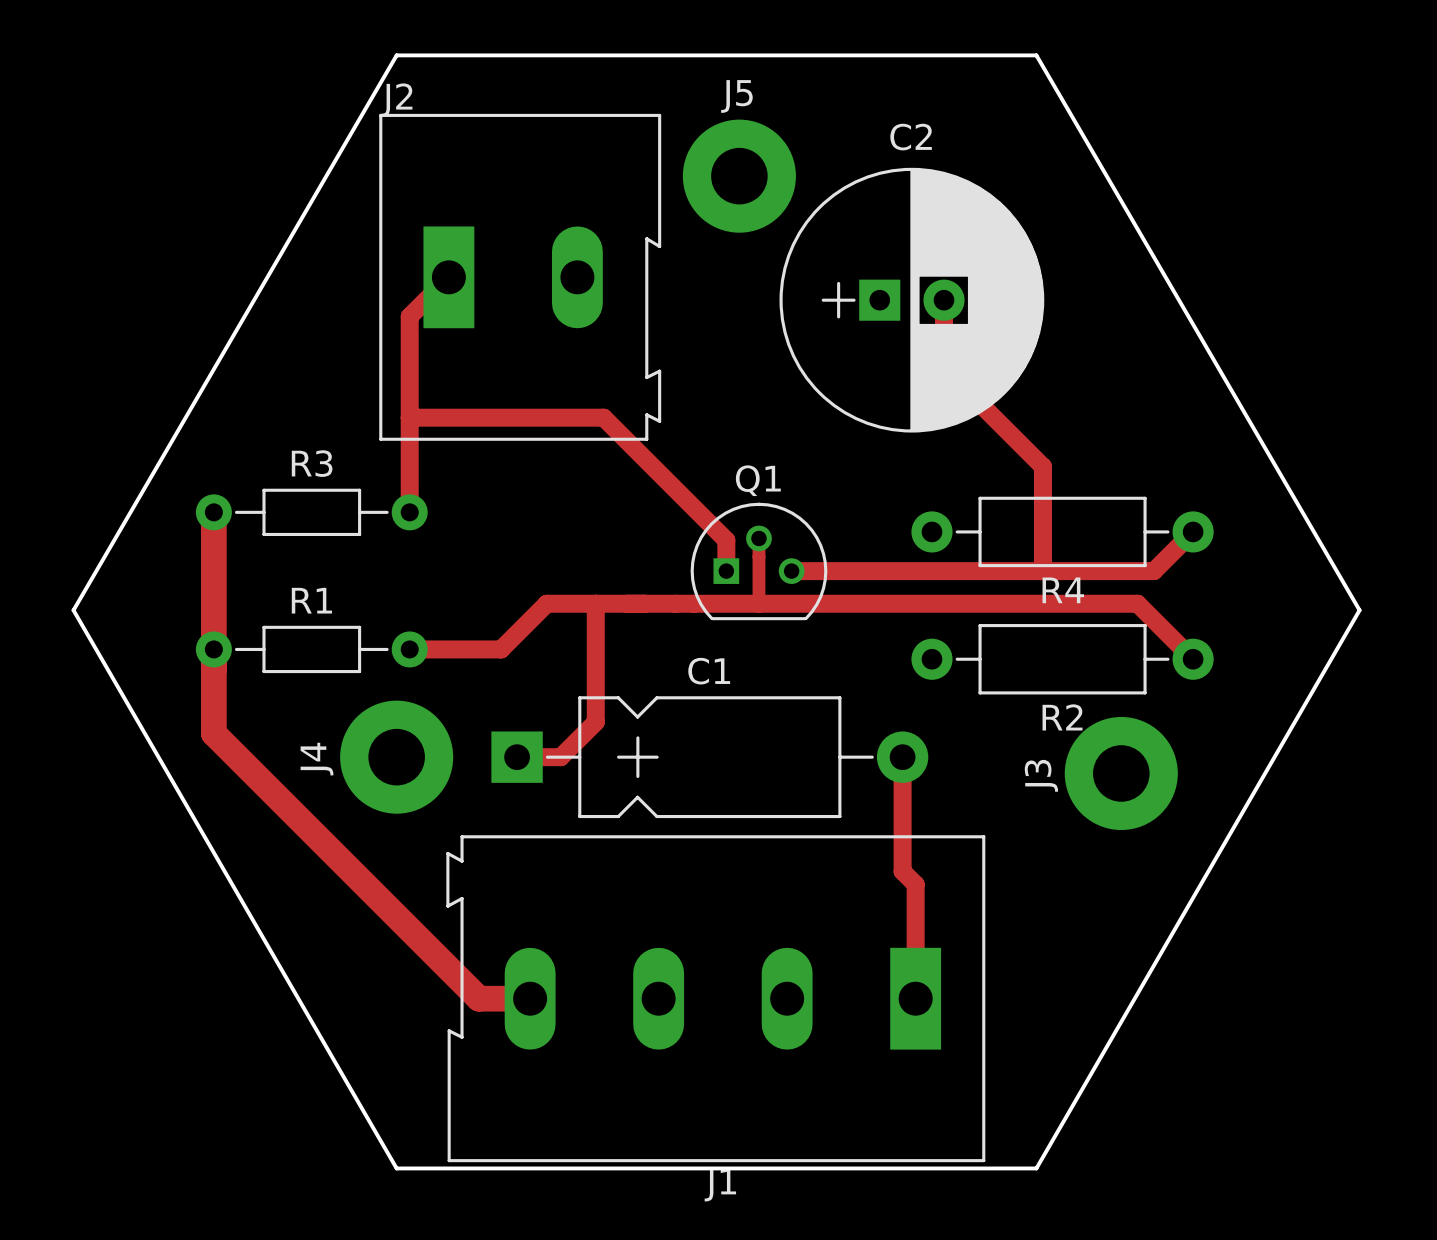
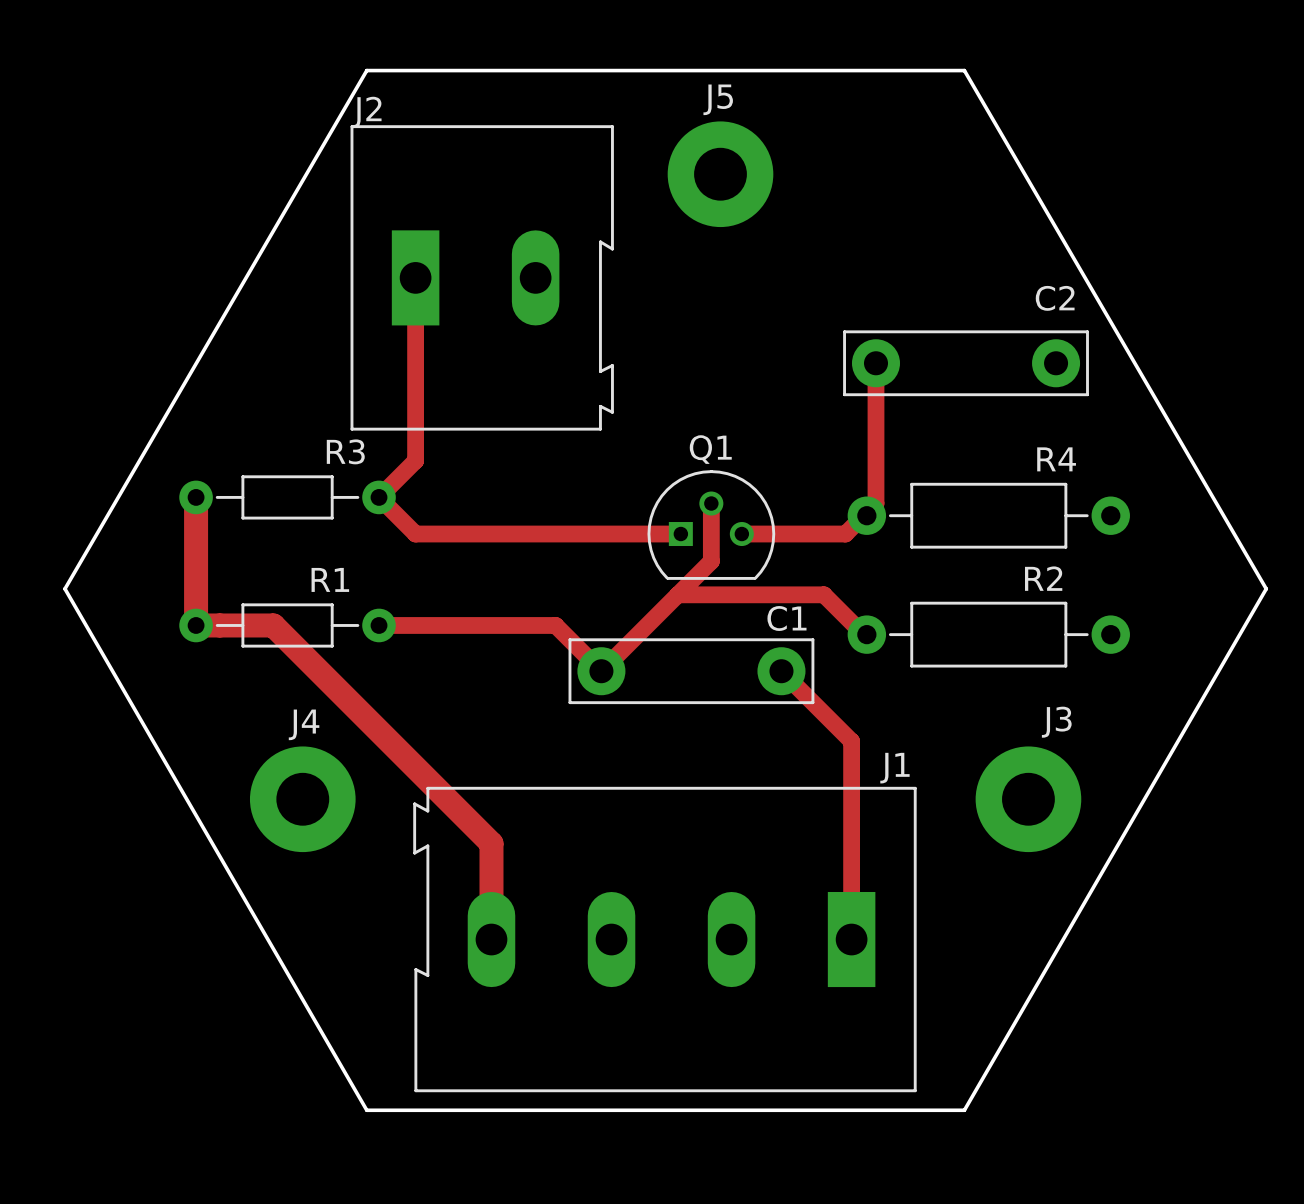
C2 name position: C2 (911, 137) -> C2 (1055, 298)
C2 footprint: [779, 167, 1045, 433] -> [843, 330, 1089, 397]
J5 position: (739, 176) -> (720, 174)
track: (448, 277) (409, 316) (409, 512) -> (415, 277) (415, 460) (379, 497) (415, 534) (680, 534)
track: (944, 300) (944, 367) (1042, 466) (1042, 571) -> none
track: none -> (875, 363) (875, 503) (845, 534) (741, 534)
track: (409, 417) (603, 417) (726, 540) (726, 571) -> none
R3 name position: R3 (312, 463) -> R3 (345, 451)
track: (1193, 531) (1153, 571) (791, 571) -> none
track: (758, 538) (758, 603) -> none
Q1 position: (758, 561) -> (711, 525)
R4 name position: R4 (1063, 590) -> R4 (1056, 459)
R1 name position: R1 (311, 600) -> R1 (330, 579)
track: (595, 603) (595, 722) (560, 757) (517, 757) -> none
track: none -> (677, 594) (823, 594) (860, 631)
track: (213, 649) (213, 733) (478, 998) (530, 998) -> (196, 625) (273, 625) (491, 843) (491, 915)
track: (501, 649) (546, 603) (1137, 603) (1193, 659) -> (464, 625) (555, 625) (601, 671) (711, 561) (711, 503)
C1 name position: C1 (709, 671) -> C1 (786, 618)
C1 footprint: [491, 696, 929, 819] -> [568, 638, 815, 705]
R2 name position: R2 (1062, 717) -> R2 (1043, 578)
J4 position: (396, 757) -> (302, 799)
track: (902, 757) (902, 871) (915, 884) -> (781, 671) (851, 741) (851, 845)
J4 name rotation: 0° (316, 759) -> 90° clockwise (304, 724)
J3 position: (1121, 773) -> (1028, 799)
J3 name rotation: 0° (1041, 775) -> 90° clockwise (1056, 722)
J3 name position: J3 (1041, 775) -> J3 (1056, 722)
J1 position: (715, 998) -> (664, 939)
J1 name position: J1 (720, 1185) -> J1 (894, 768)

